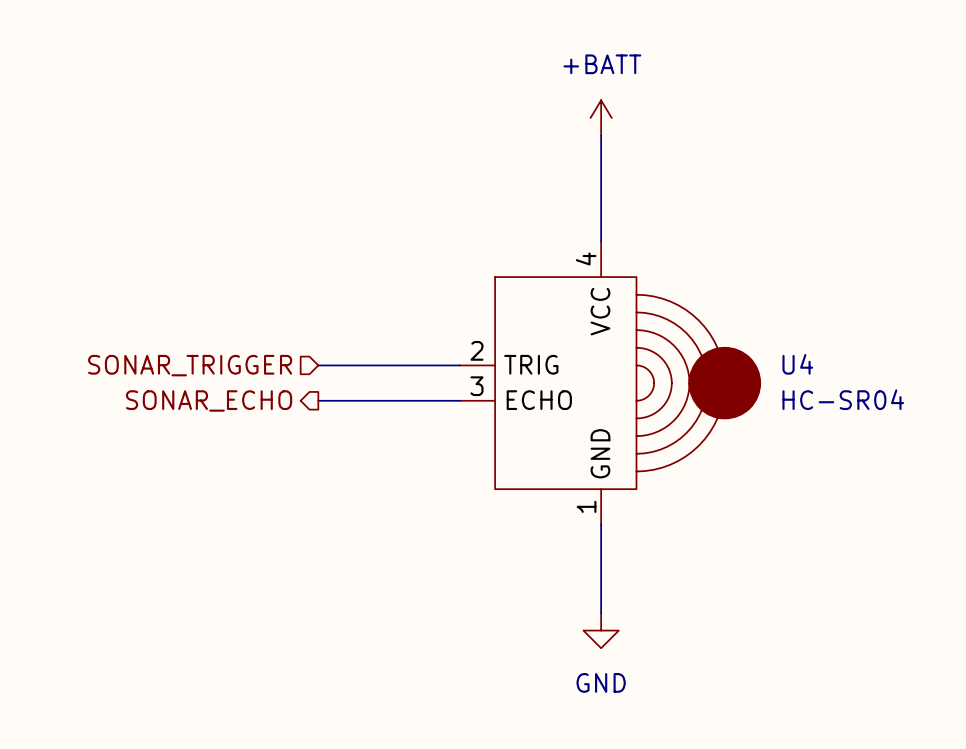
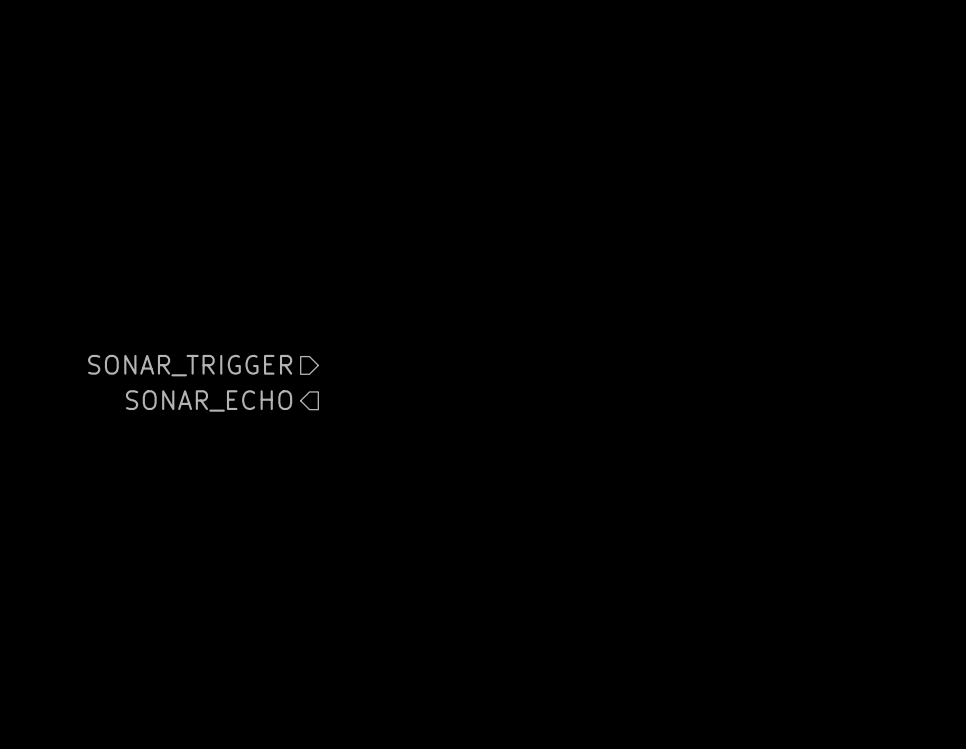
power symbol: +BATT (601, 117) -> none
wire: (601, 135) (601, 241) -> none
wire: (318, 365) (459, 365) -> none
U4: HC-SR04 (609, 383) -> none
wire: (318, 400) (459, 400) -> none
wire: (601, 524) (601, 612) -> none
power symbol: GND (601, 630) -> none

